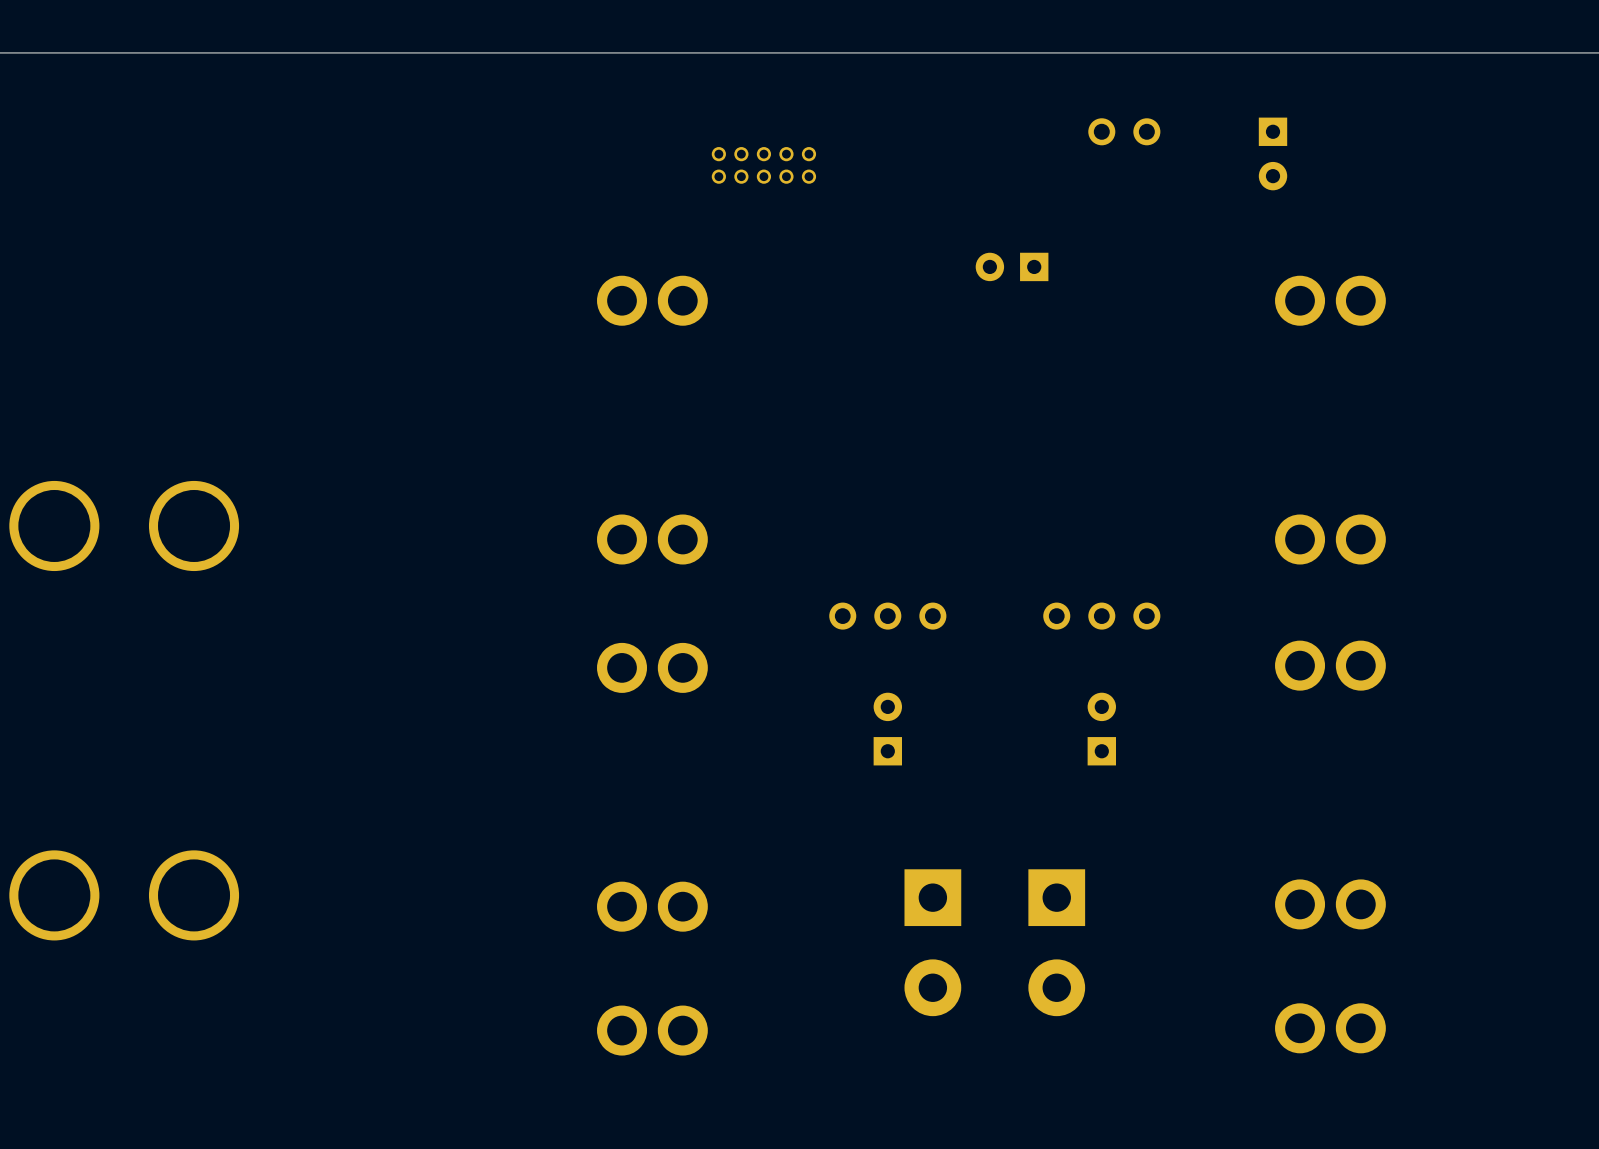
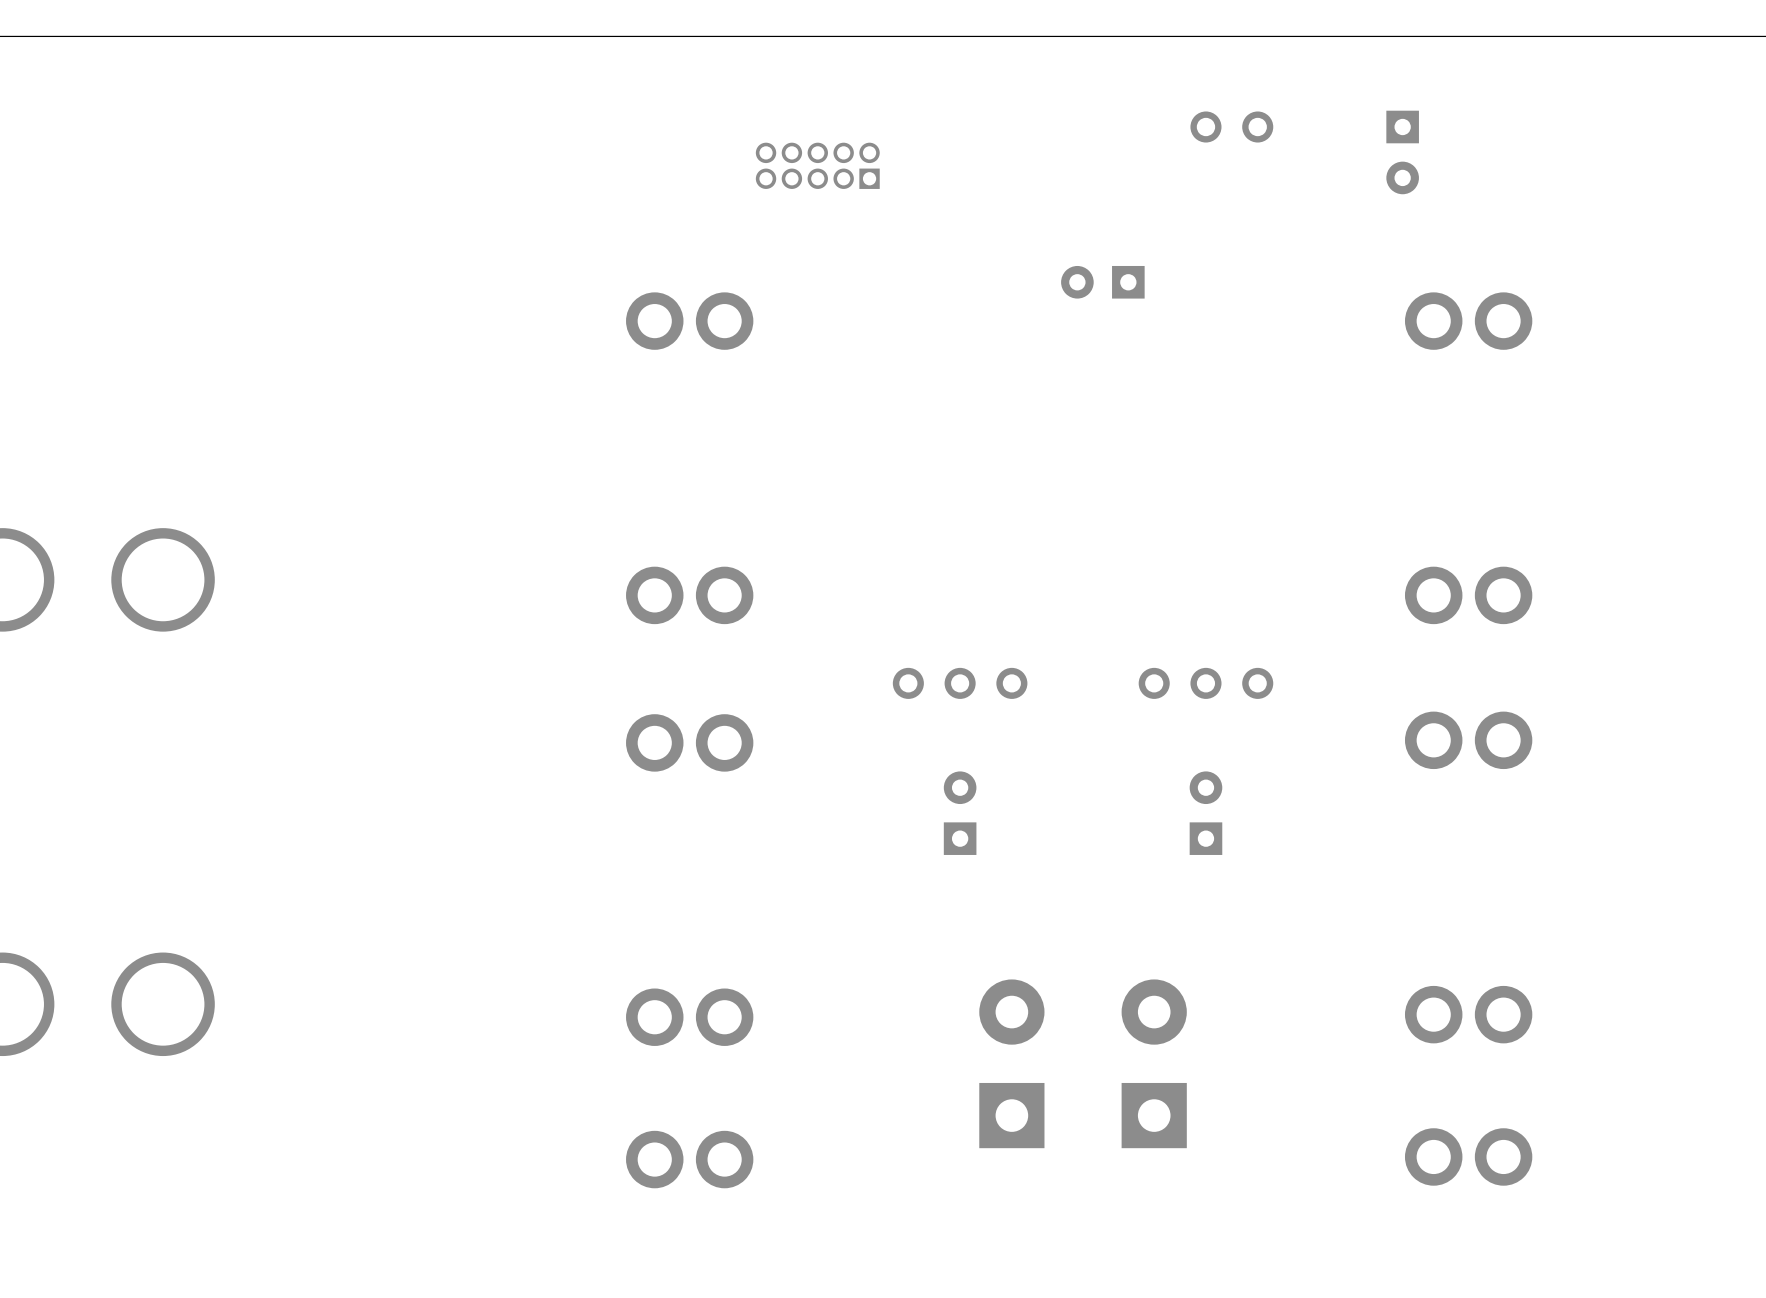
part footprint: [711, 147, 817, 184] -> [755, 142, 880, 189]
part rotation: 0° (932, 942) -> 180° (1011, 1063)
part rotation: 0° (1056, 942) -> 180° (1154, 1063)

